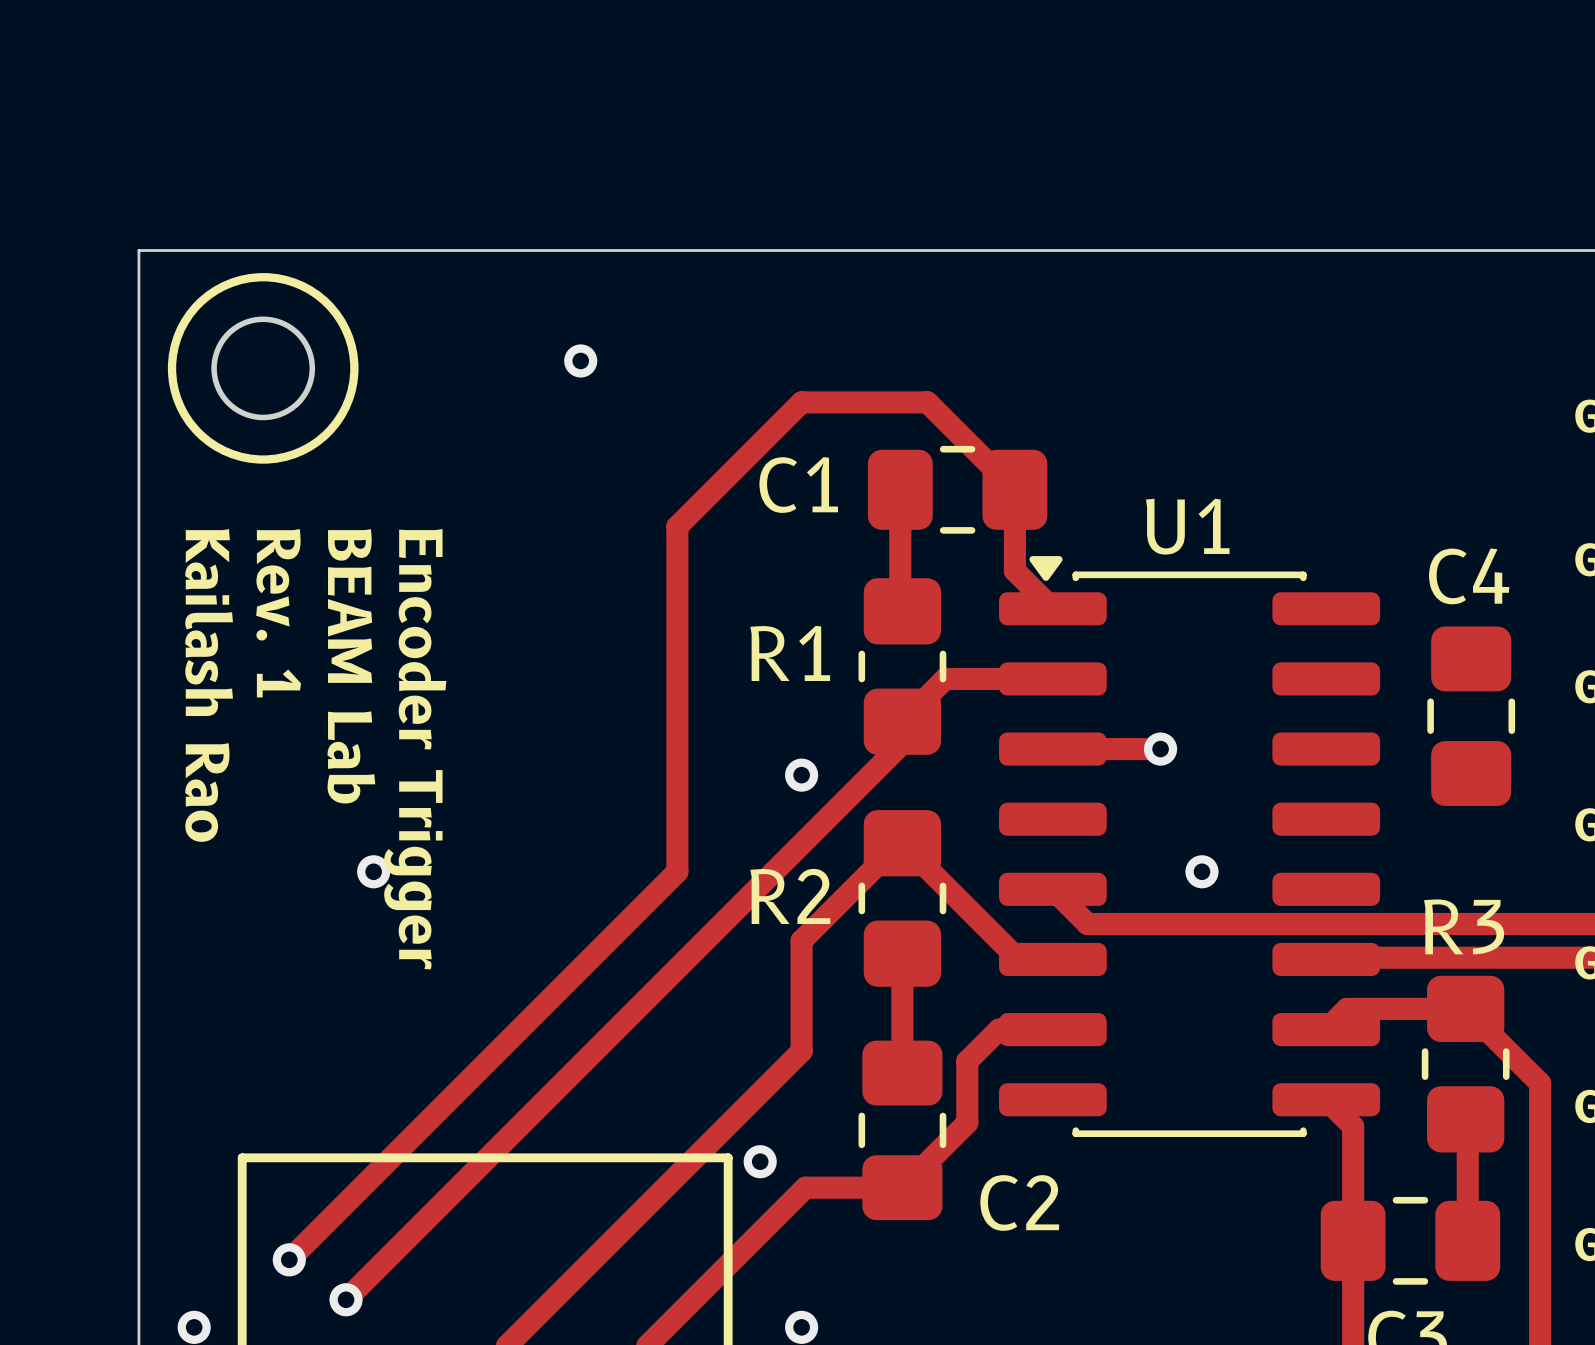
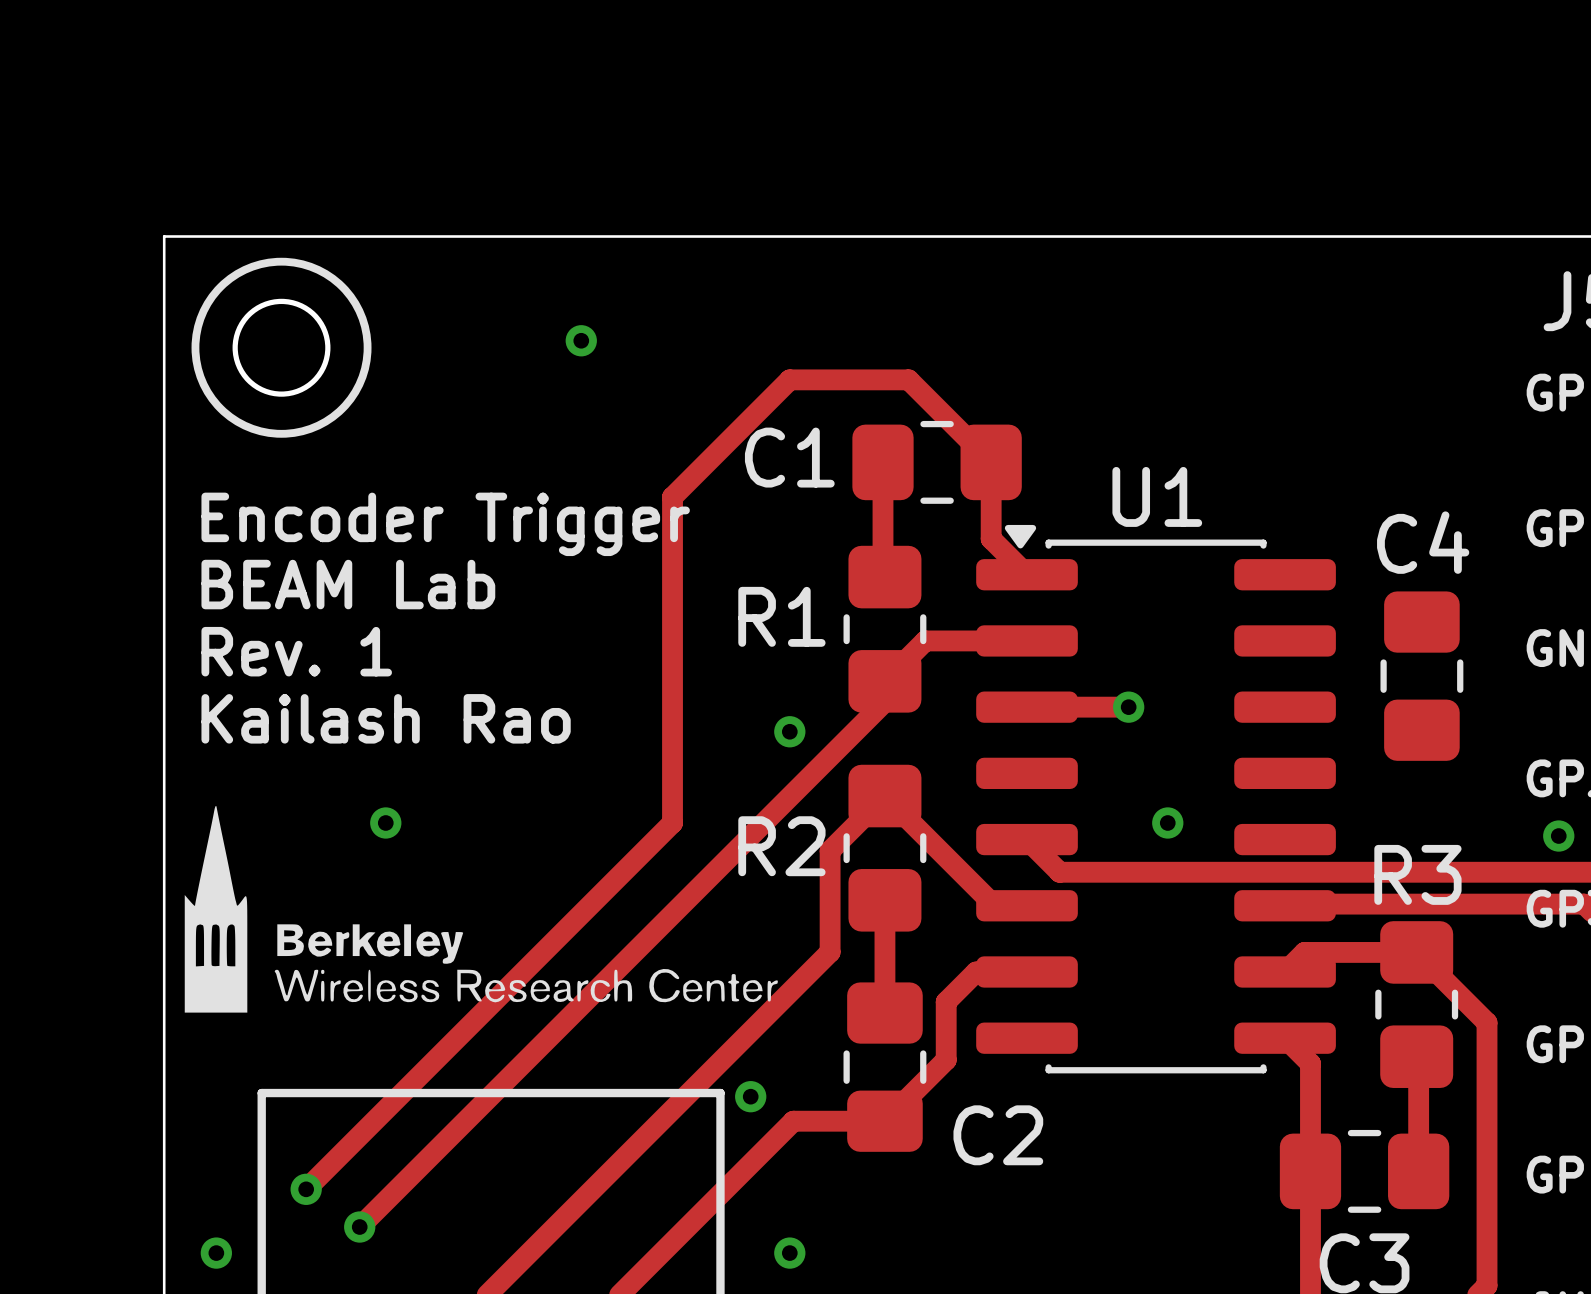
text rotation: 0° (278, 613) -> 90° counterclockwise (296, 651)
text rotation: 0° (351, 666) -> 90° counterclockwise (348, 584)
text rotation: 0° (209, 685) -> 90° counterclockwise (386, 718)
text rotation: 0° (415, 749) -> 90° counterclockwise (445, 524)
track: (902, 843) (899, 843) (801, 940) (801, 1051) -> (884, 796) (830, 850) (830, 952) (789, 992)
drawing: none -> [184, 806, 778, 1013]

